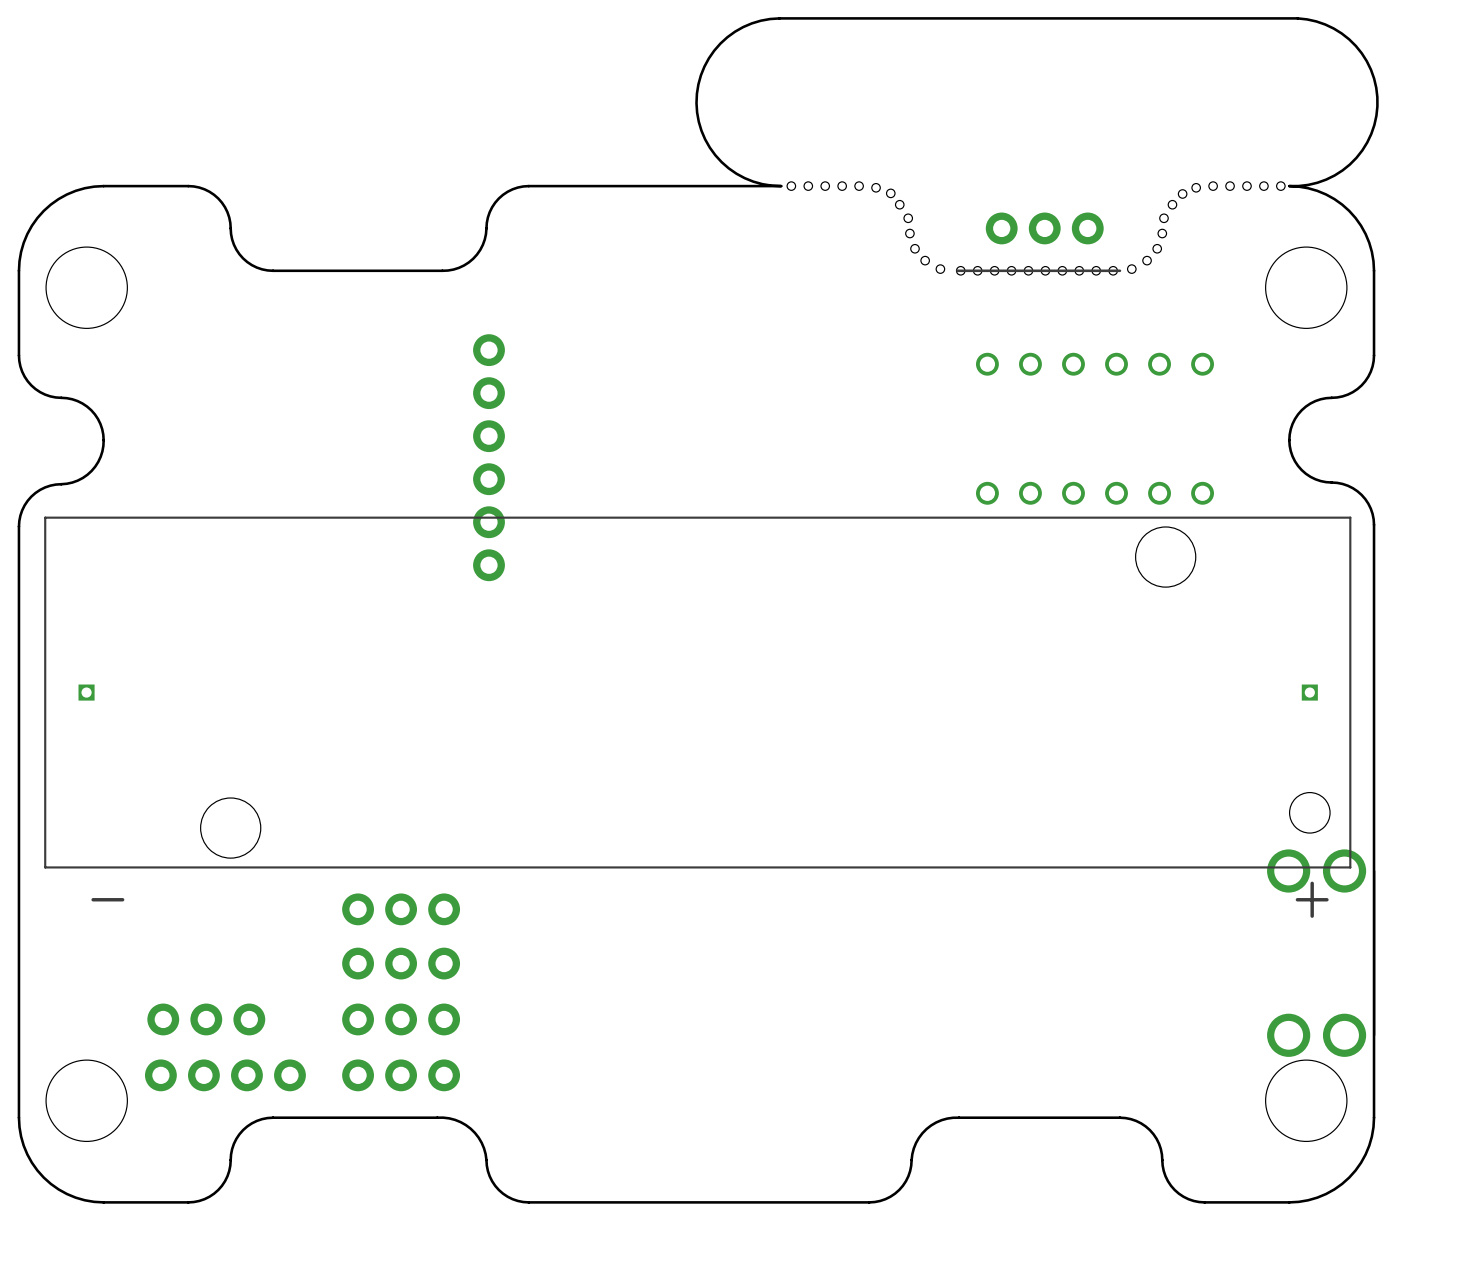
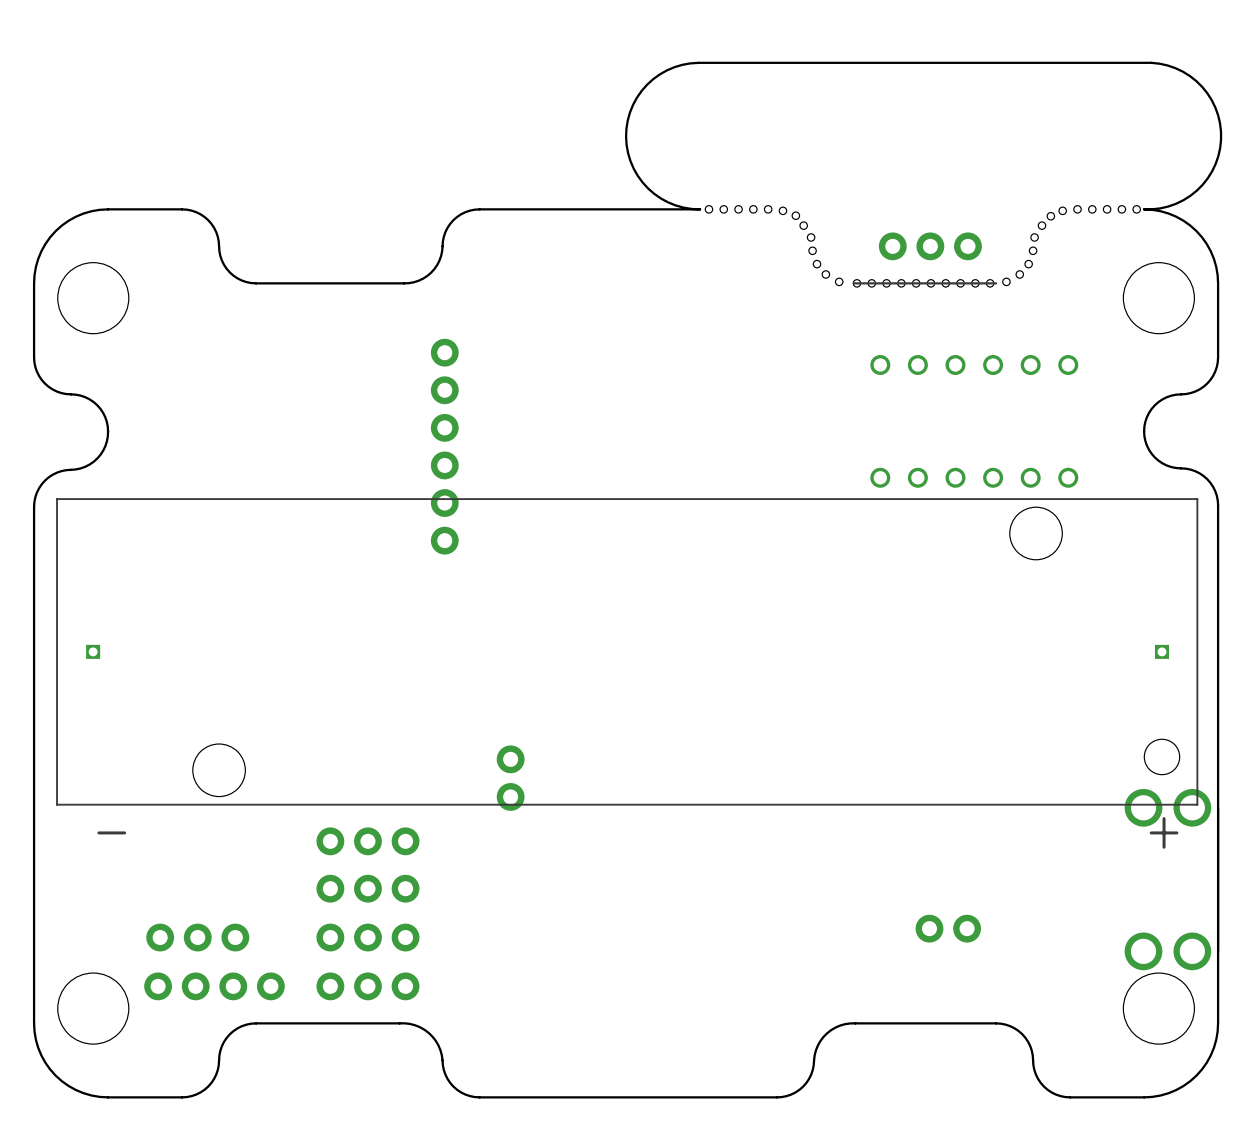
part: none -> (510, 778)
part: none -> (948, 928)

